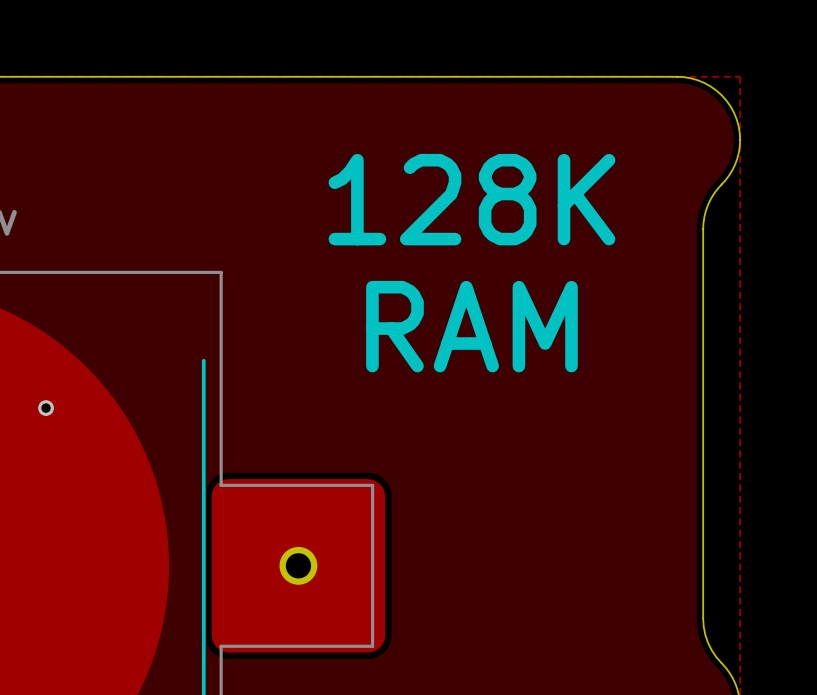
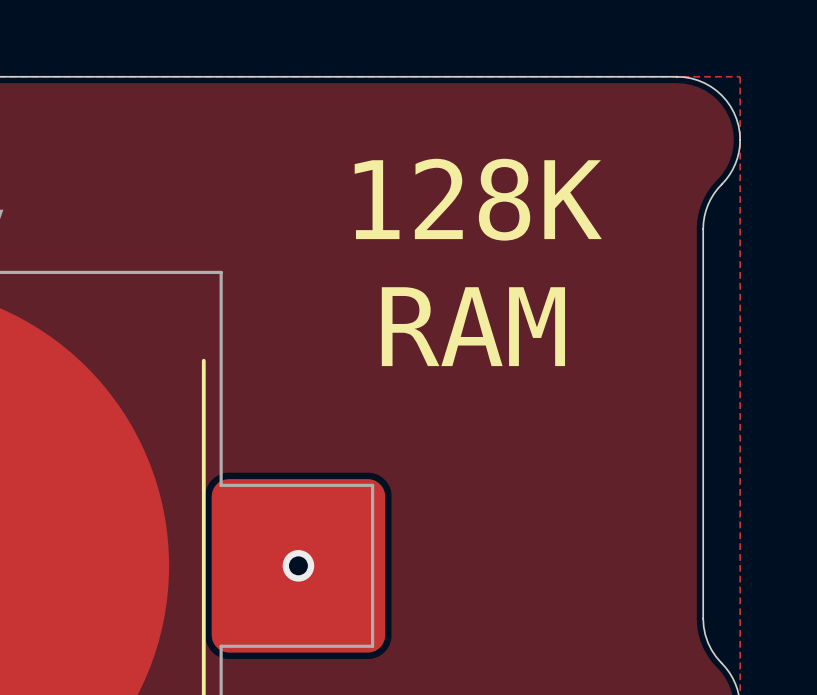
via: (46, 408) -> none
part: (298, 565) -> none
via: none -> (298, 565)

